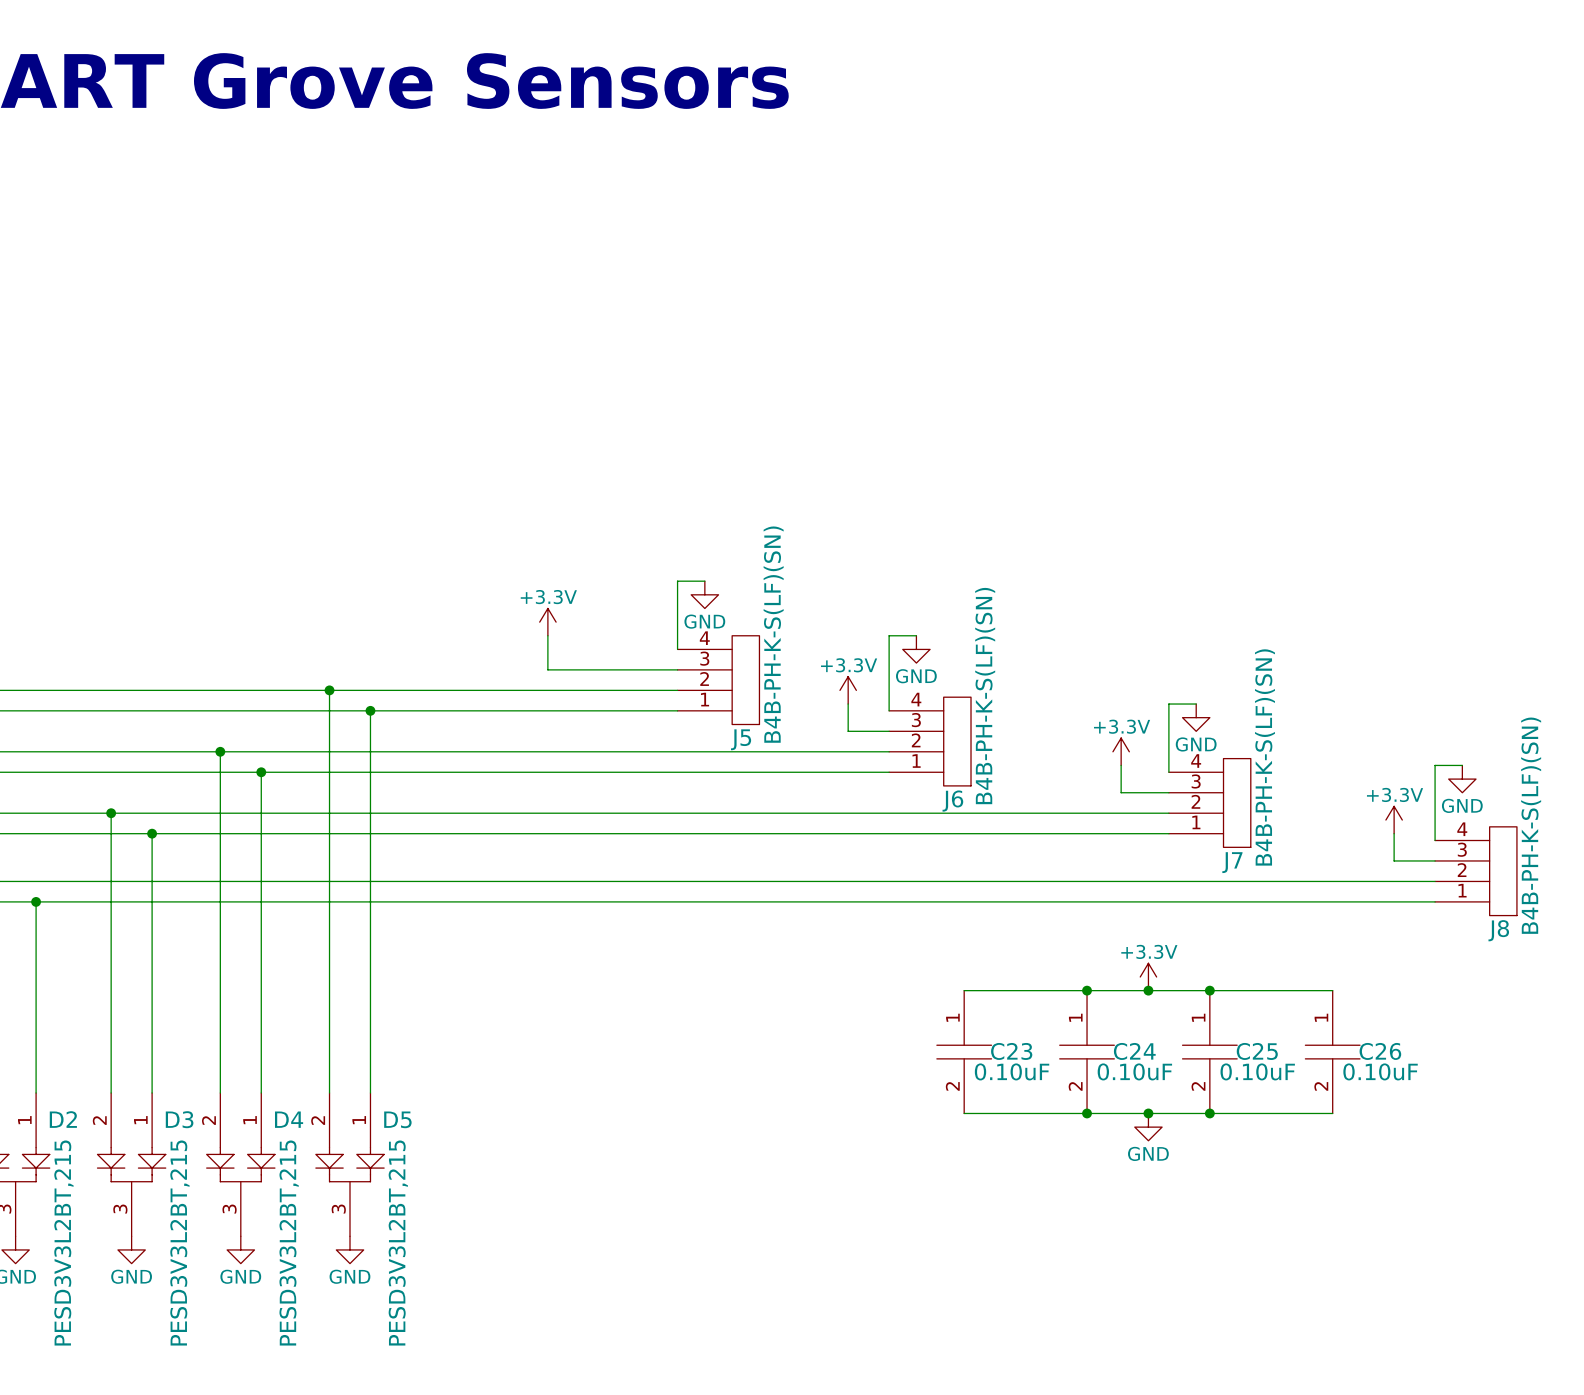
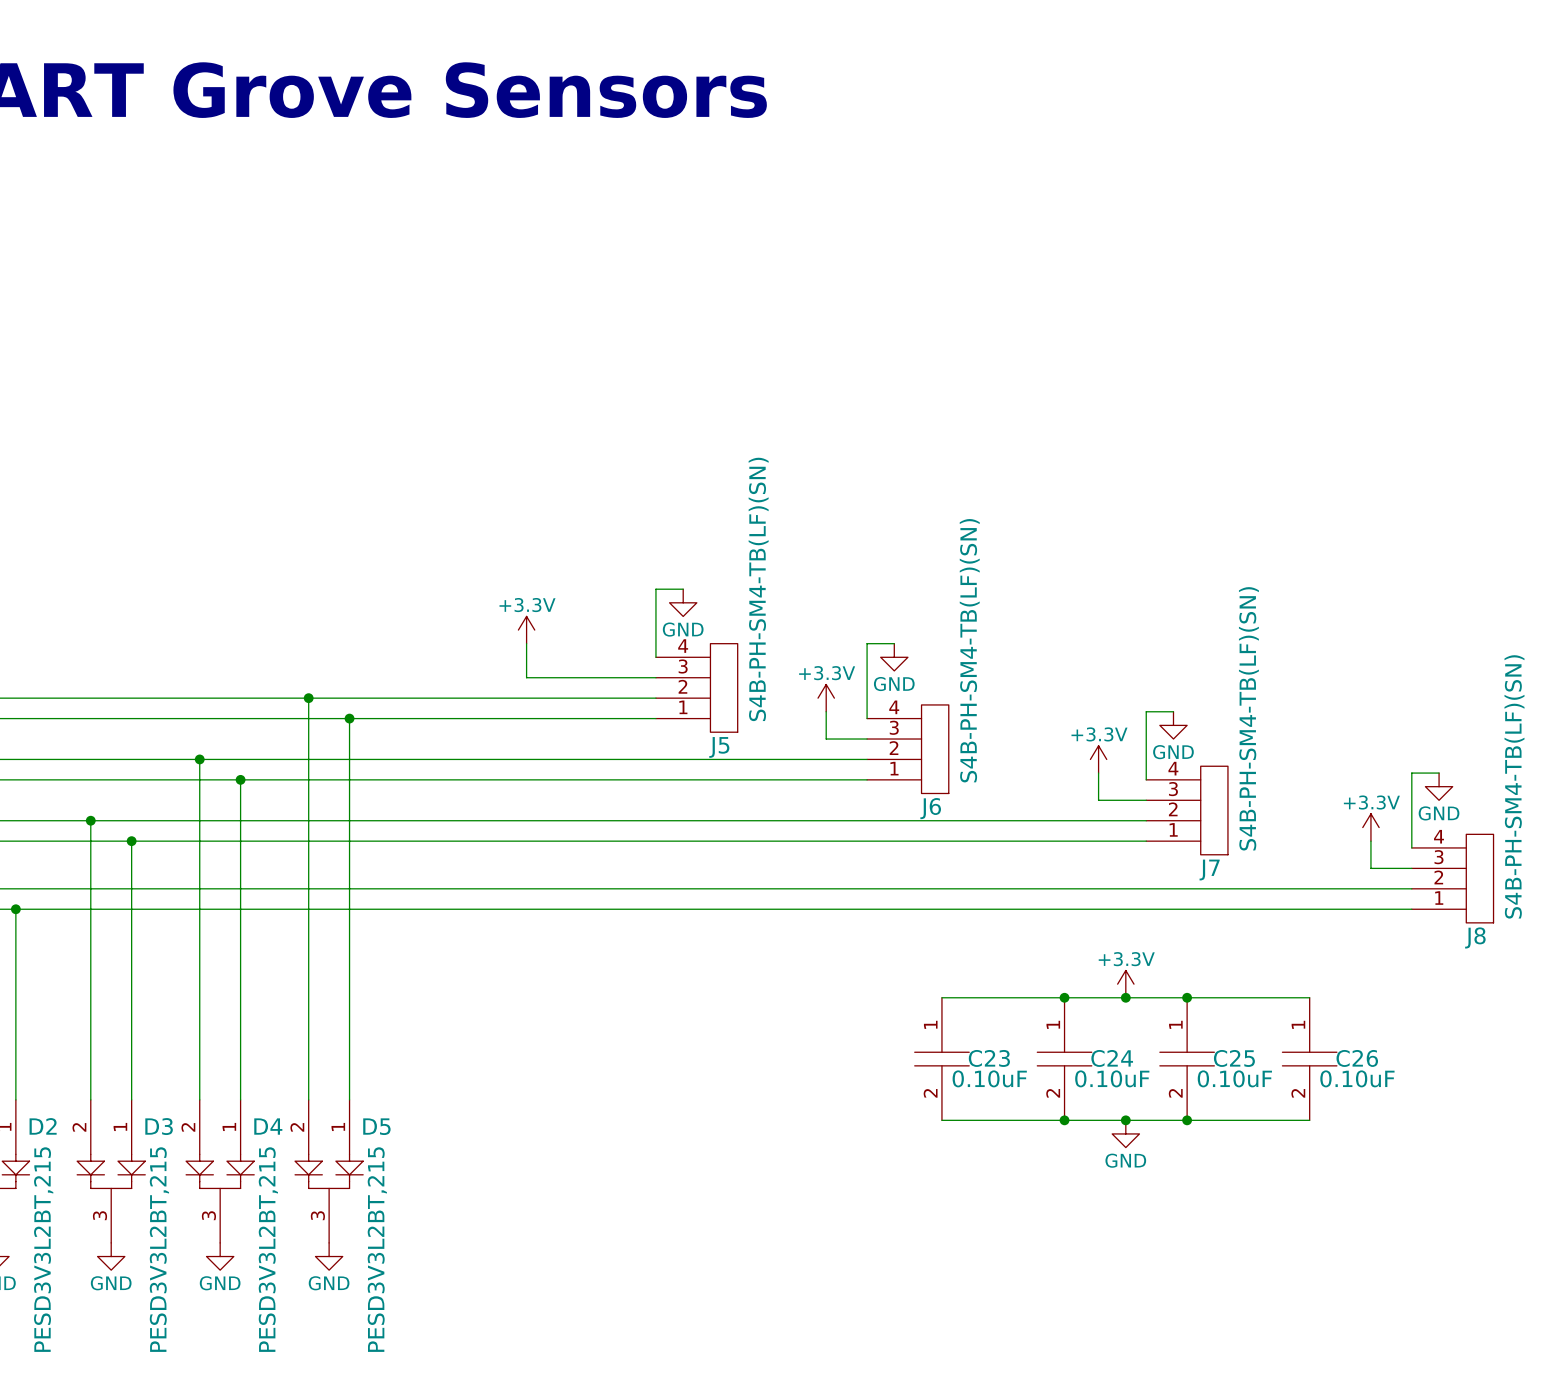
J5 value: B4B-PH-K-S(LF)(SN) (773, 634) -> S4B-PH-SM4-TB(LF)(SN) (758, 589)
J6 value: B4B-PH-K-S(LF)(SN) (985, 696) -> S4B-PH-SM4-TB(LF)(SN) (969, 650)
J7 value: B4B-PH-K-S(LF)(SN) (1264, 757) -> S4B-PH-SM4-TB(LF)(SN) (1248, 718)
J8 value: B4B-PH-K-S(LF)(SN) (1531, 825) -> S4B-PH-SM4-TB(LF)(SN) (1514, 786)

